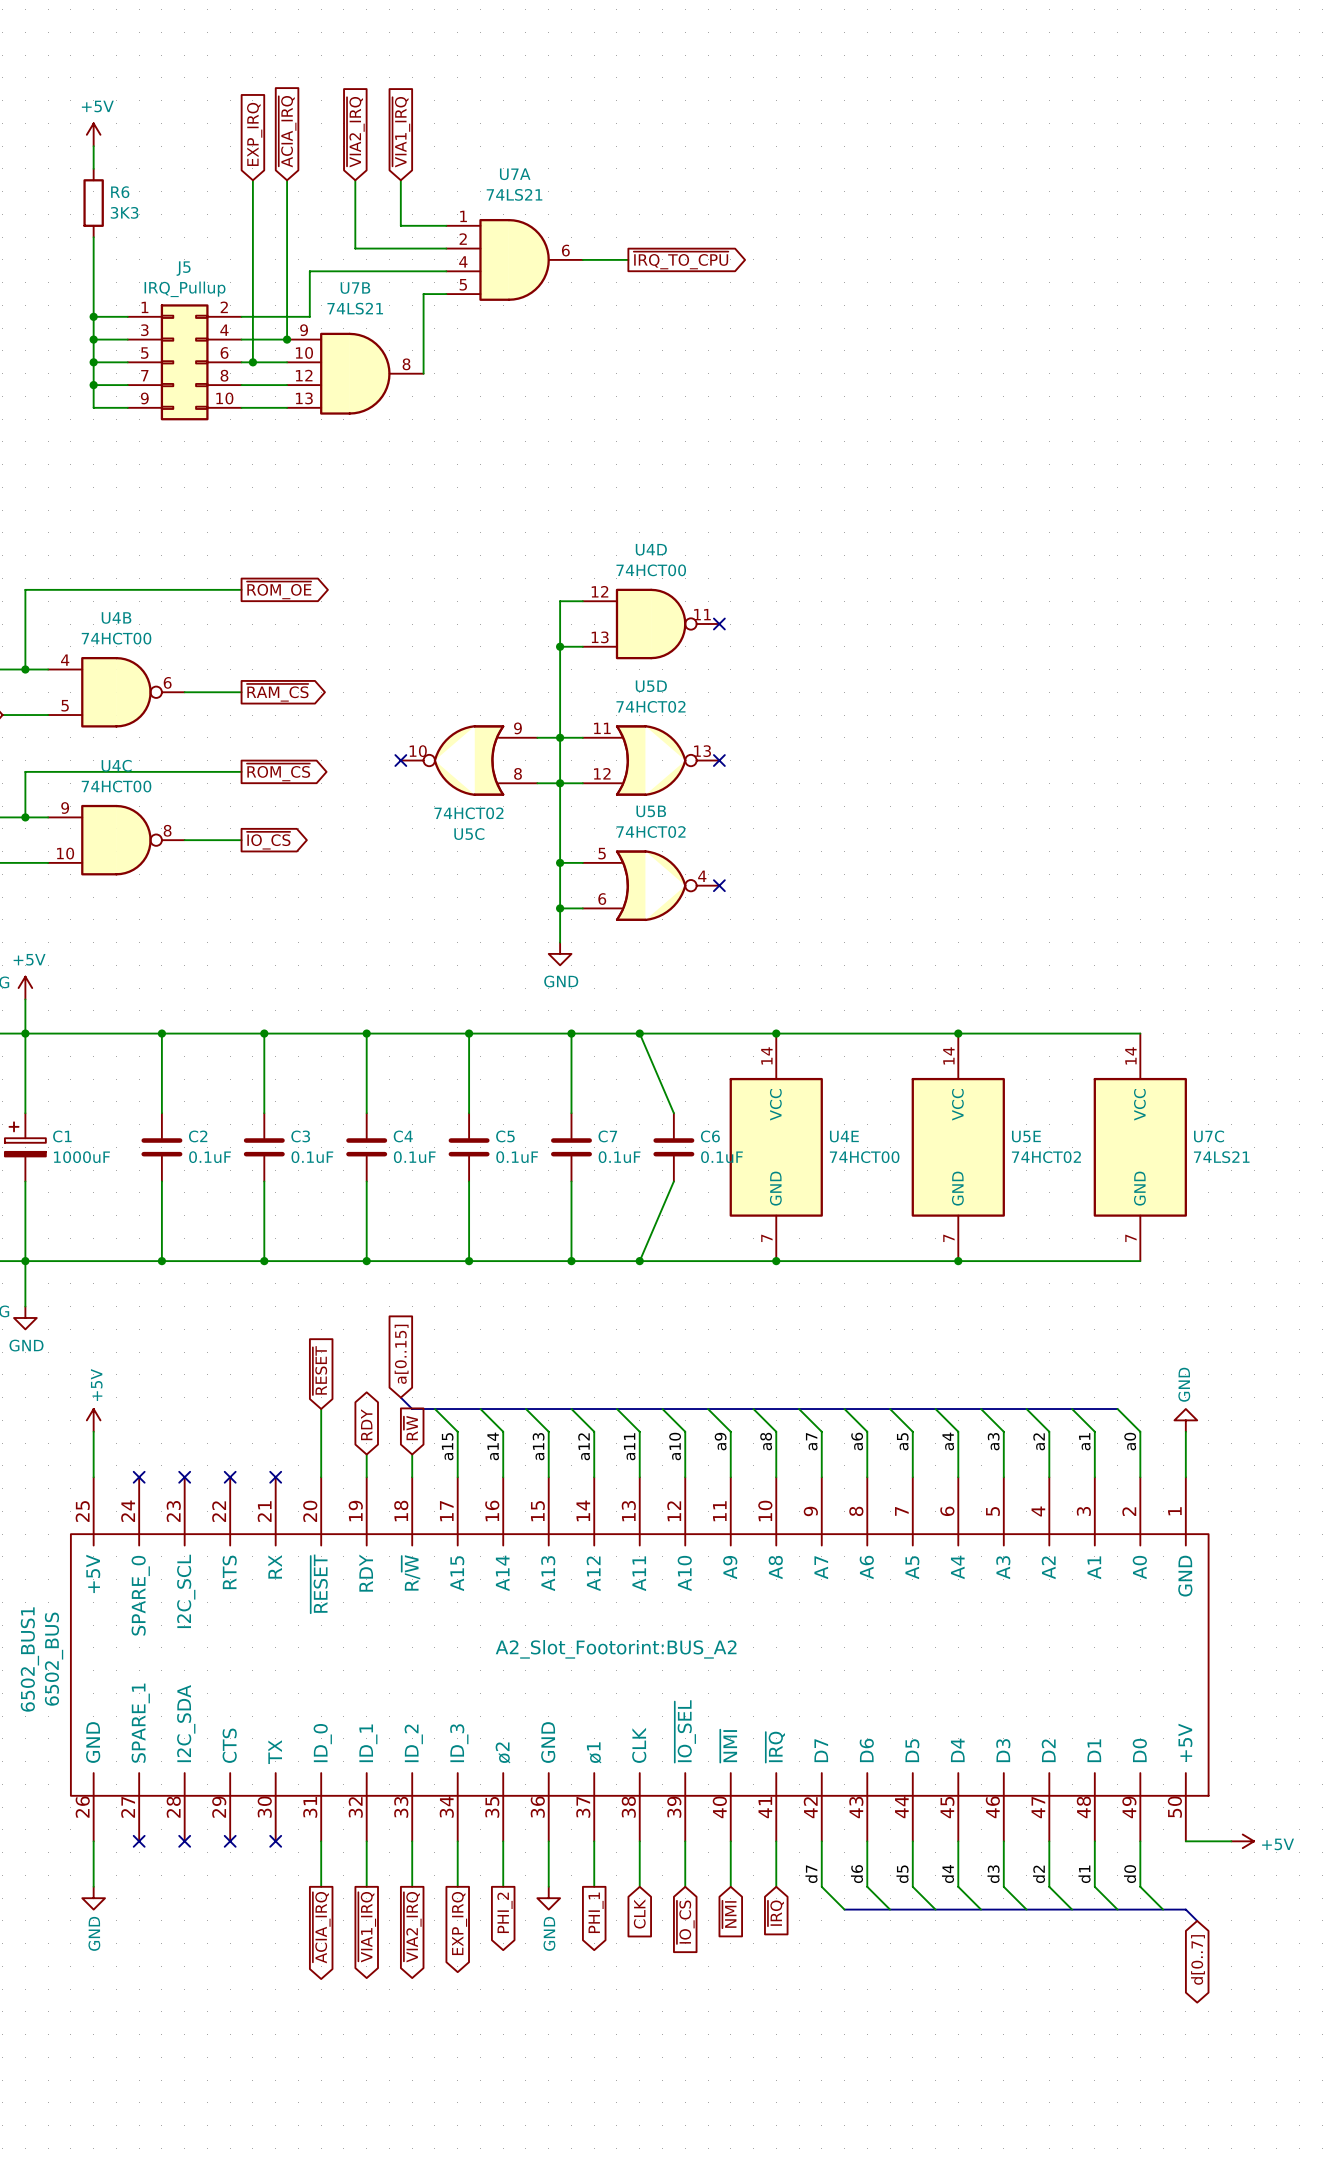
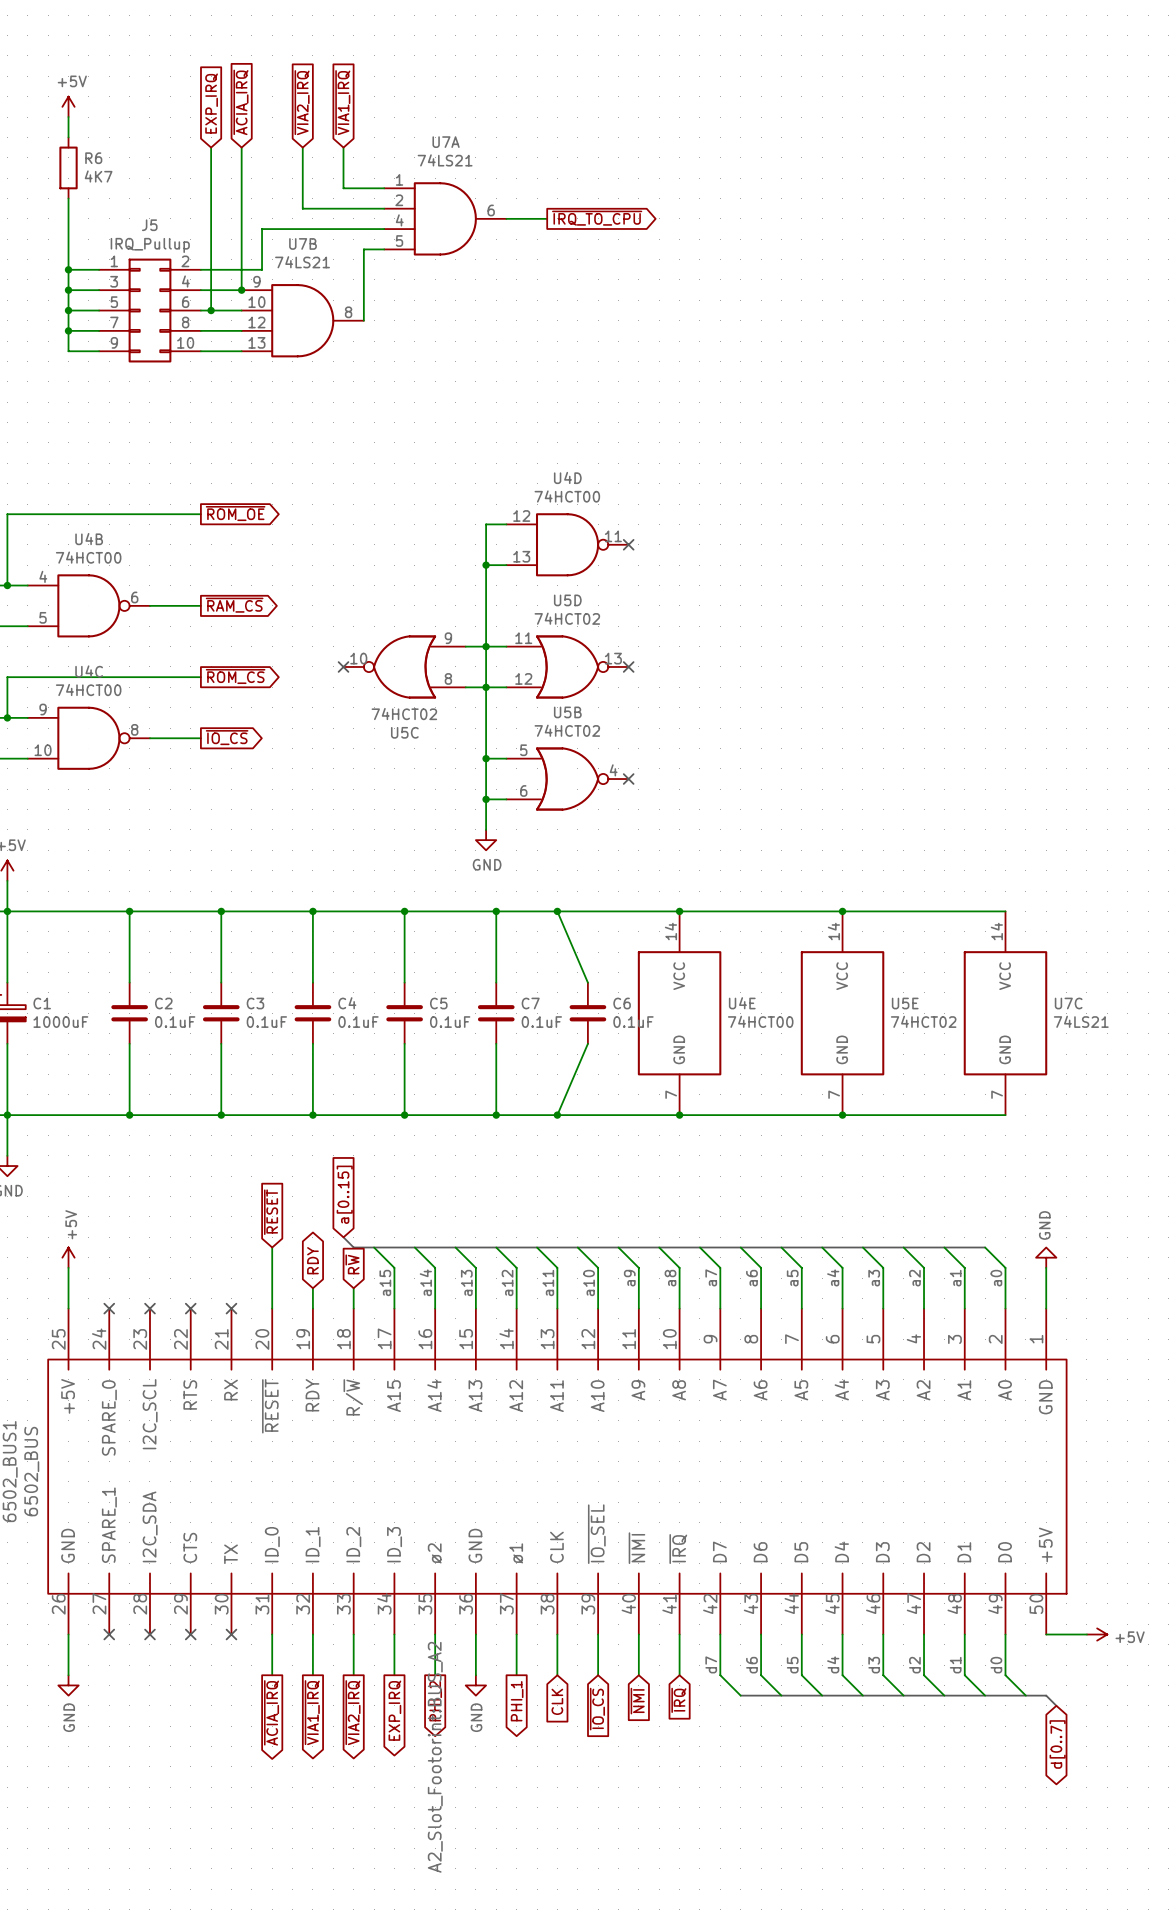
R6 value: 3K3 (124, 212) -> 4K7 (98, 176)
6502_BUS1 text rotation: 0° (616, 1649) -> 90° counterclockwise (435, 1757)
6502_BUS1 text position: A2_Slot_Footorint:BUS_A2 (616, 1649) -> A2_Slot_Footorint:BUS_A2 (435, 1757)

